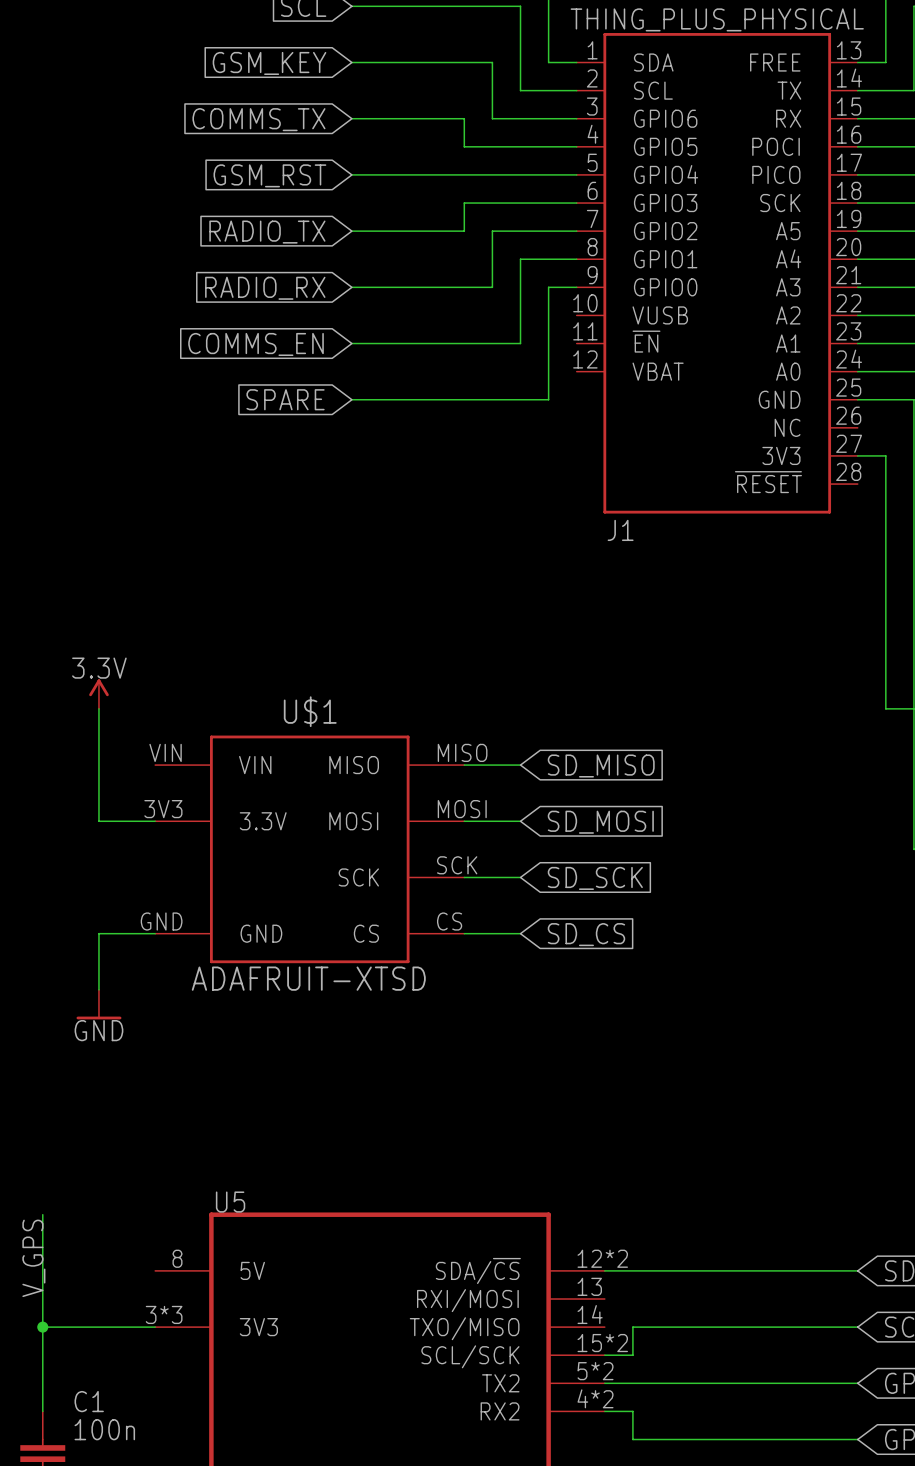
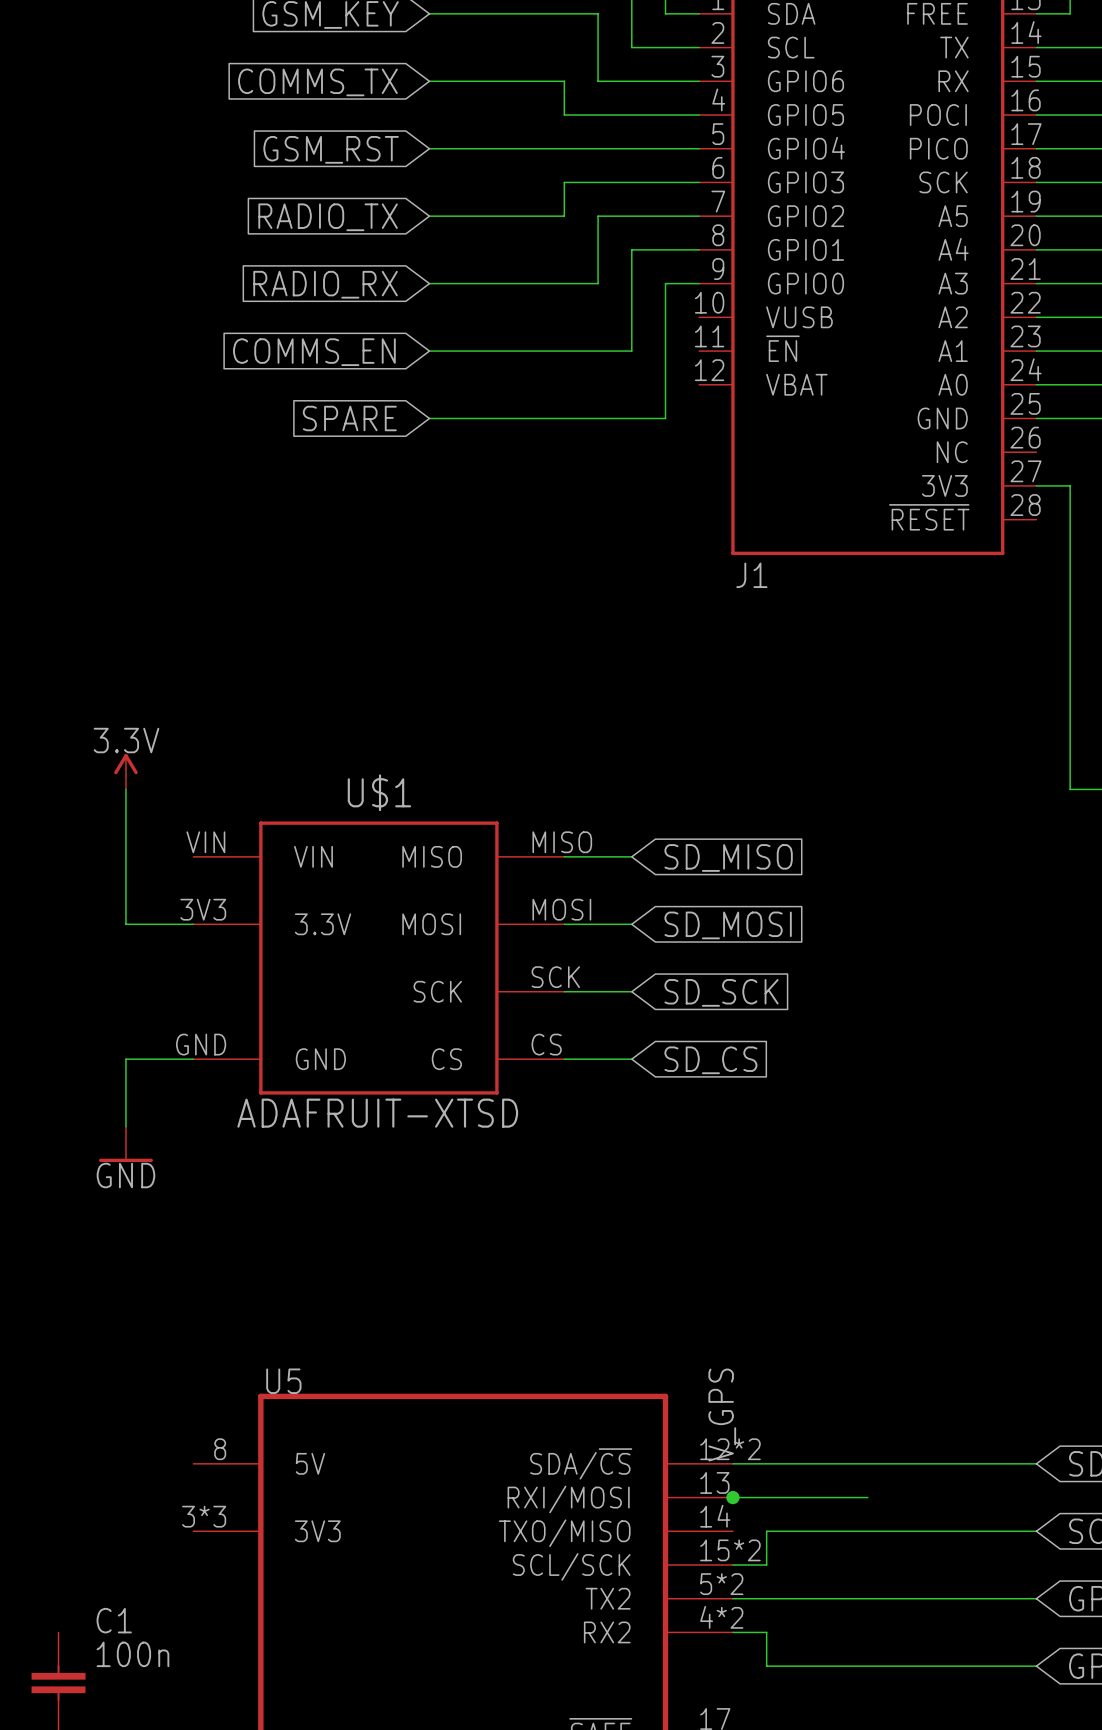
wire: (42, 1214) (42, 1411) -> none
label: none -> V_GPS (722, 1415)
label: V_GPS (33, 1258) -> none
wire: none -> (732, 1497) (867, 1497)
junction: none -> (732, 1497)
wire: (42, 1327) (155, 1327) -> none
junction: (42, 1327) -> none

